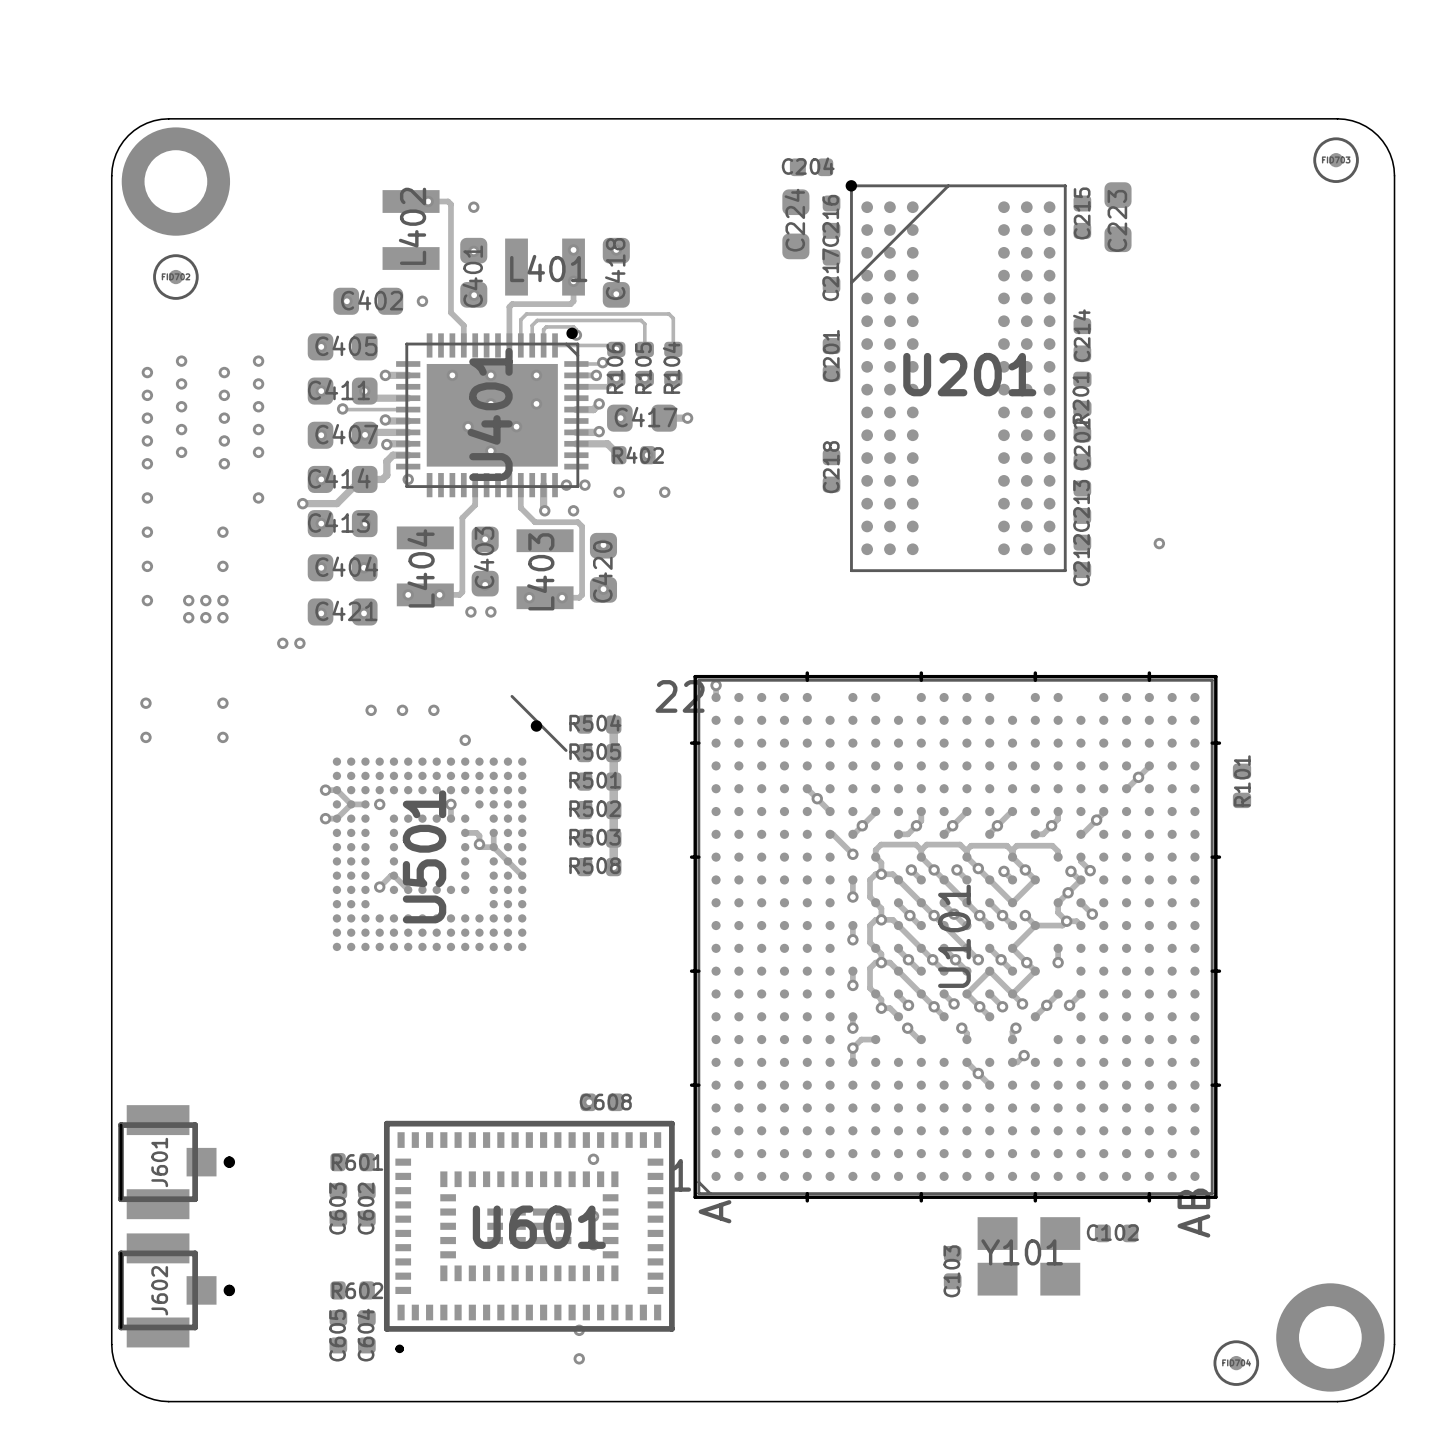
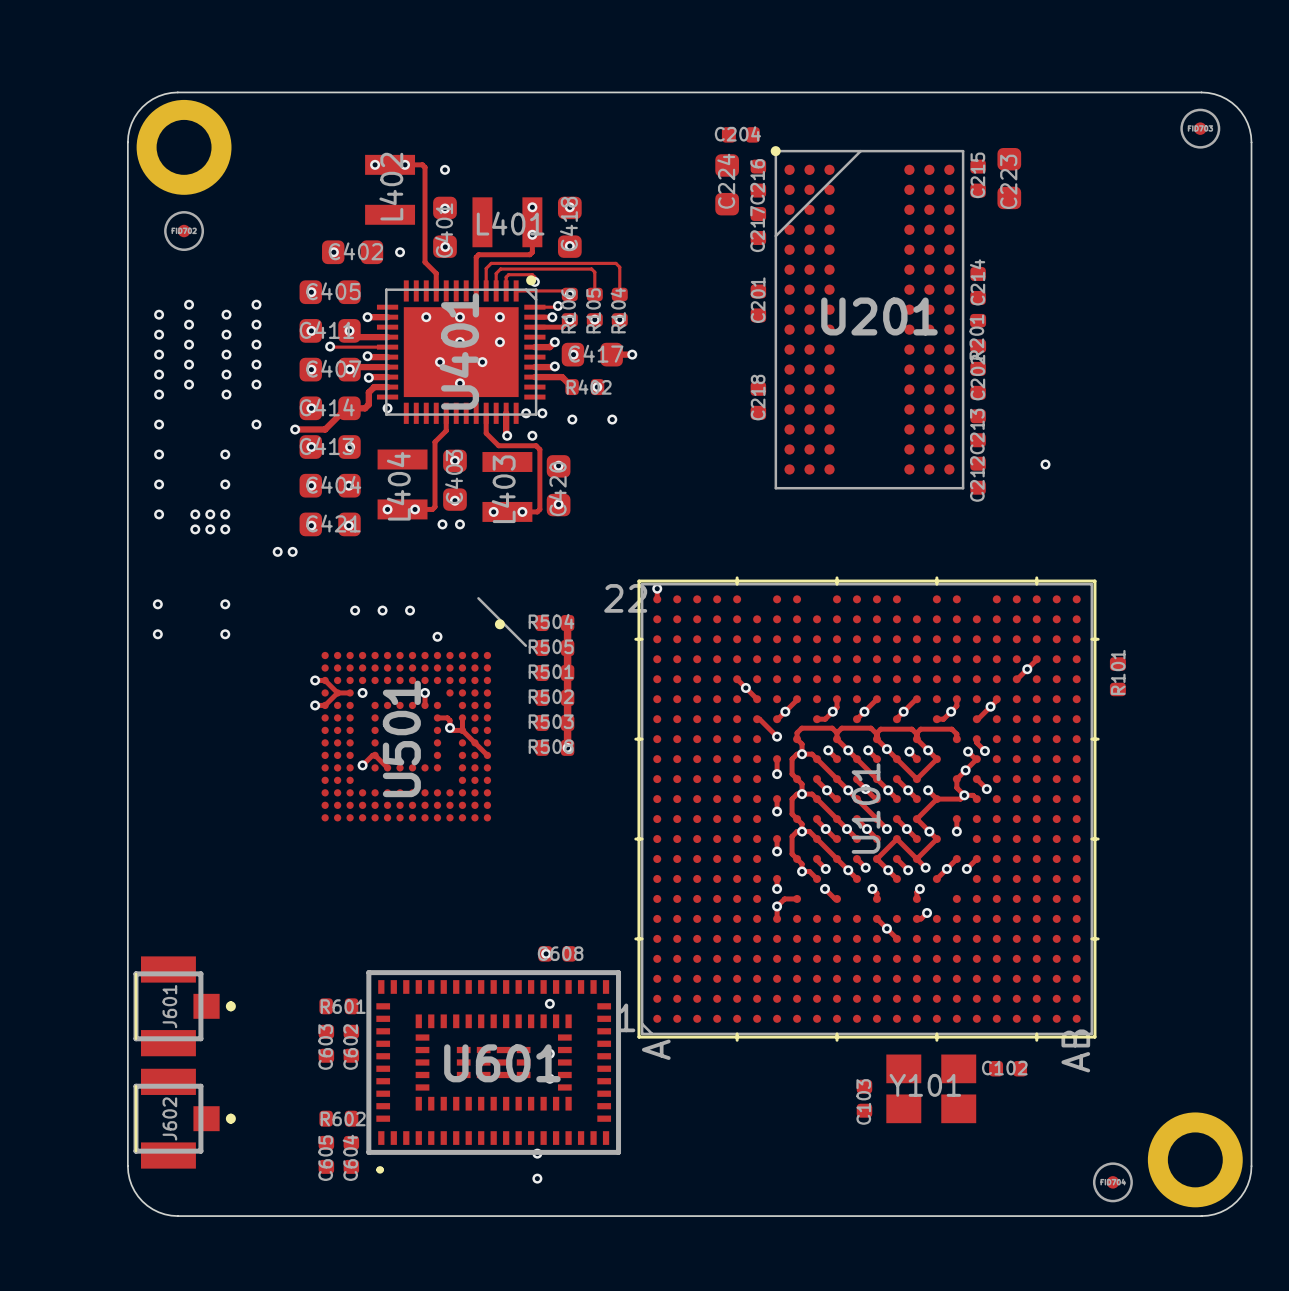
via: none -> (375, 164)

